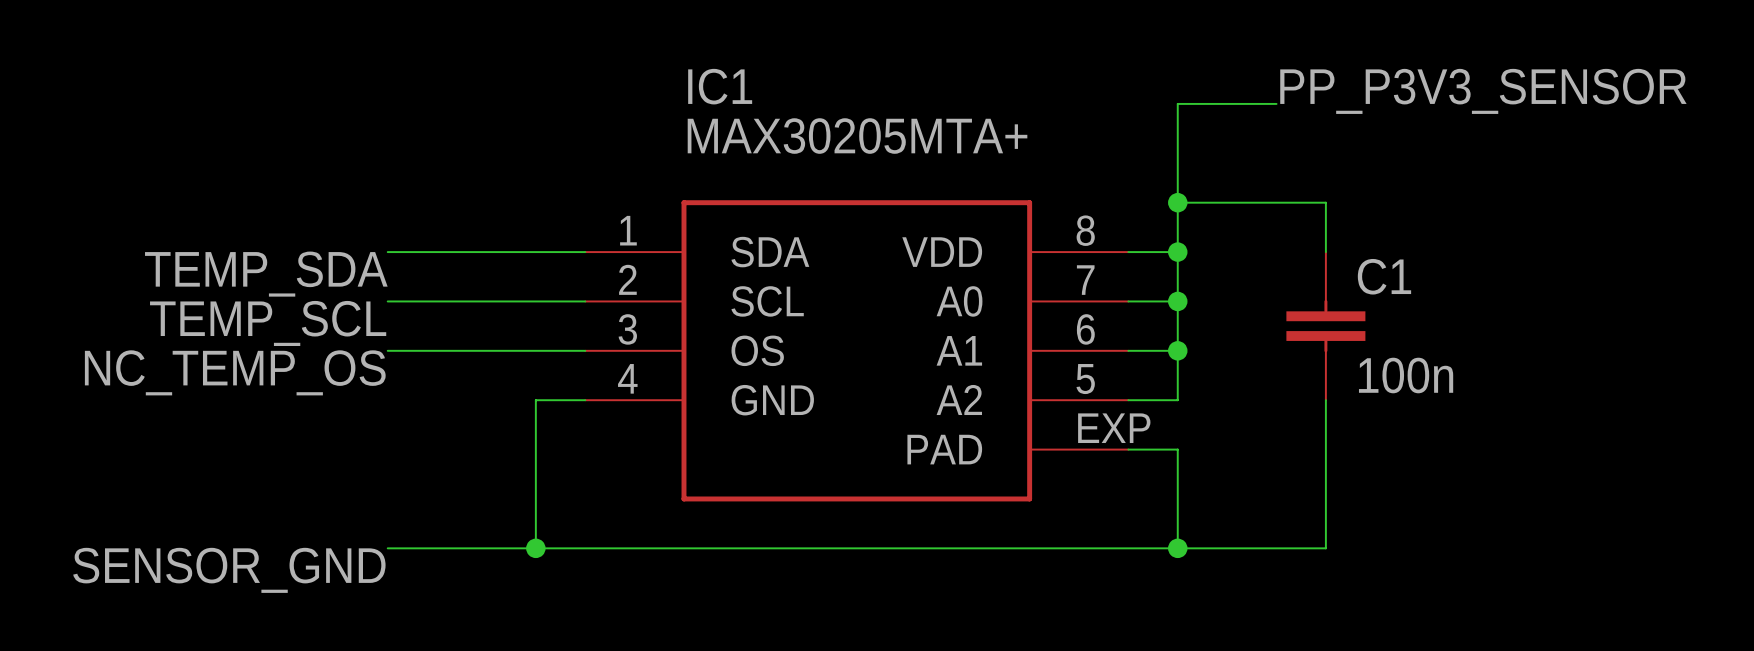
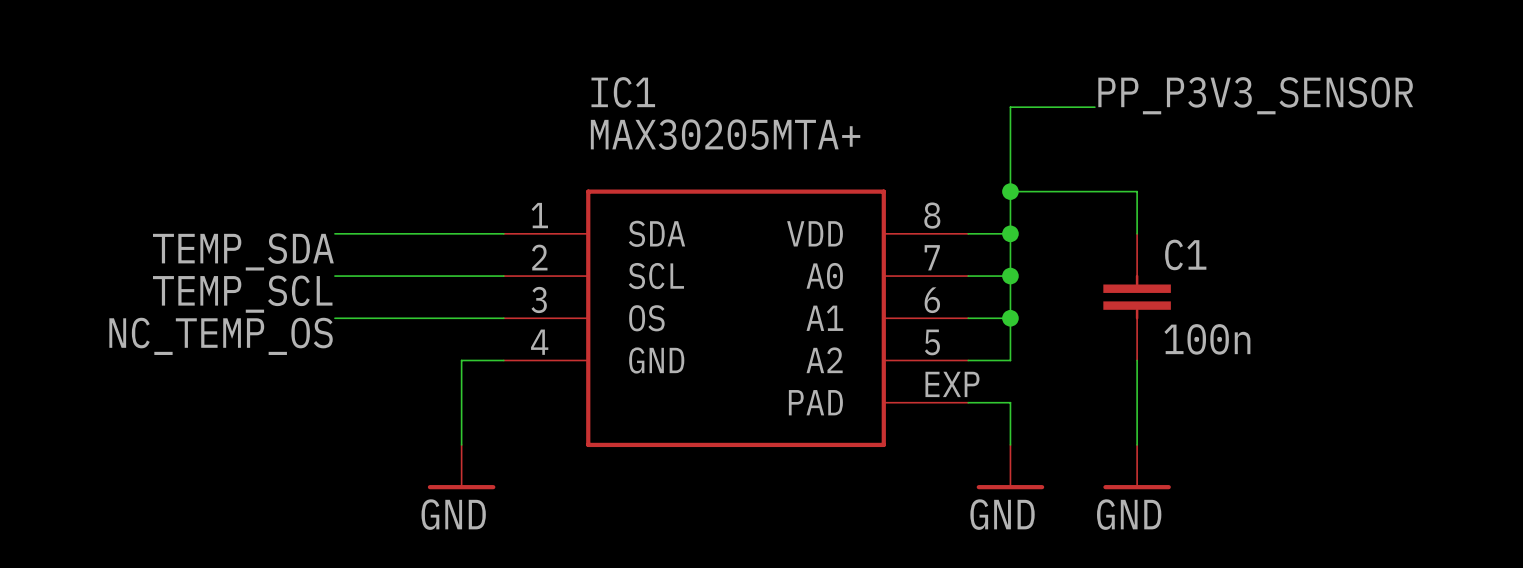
wire: (1325, 498) (1325, 548) (387, 548) -> none
power symbol: none -> GND (461, 467)
power symbol: none -> GND (1010, 467)
power symbol: none -> GND (1137, 467)
junction: (535, 548) -> none
junction: (1177, 548) -> none
label: SENSOR_GND (229, 570) -> none

